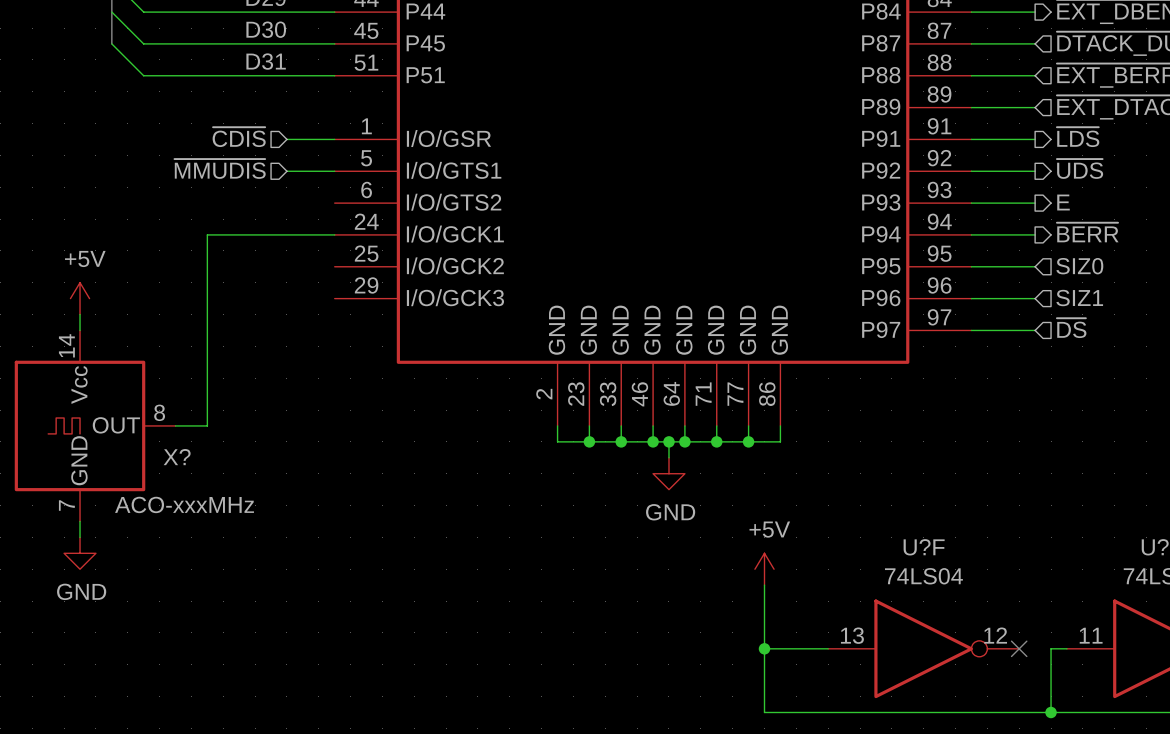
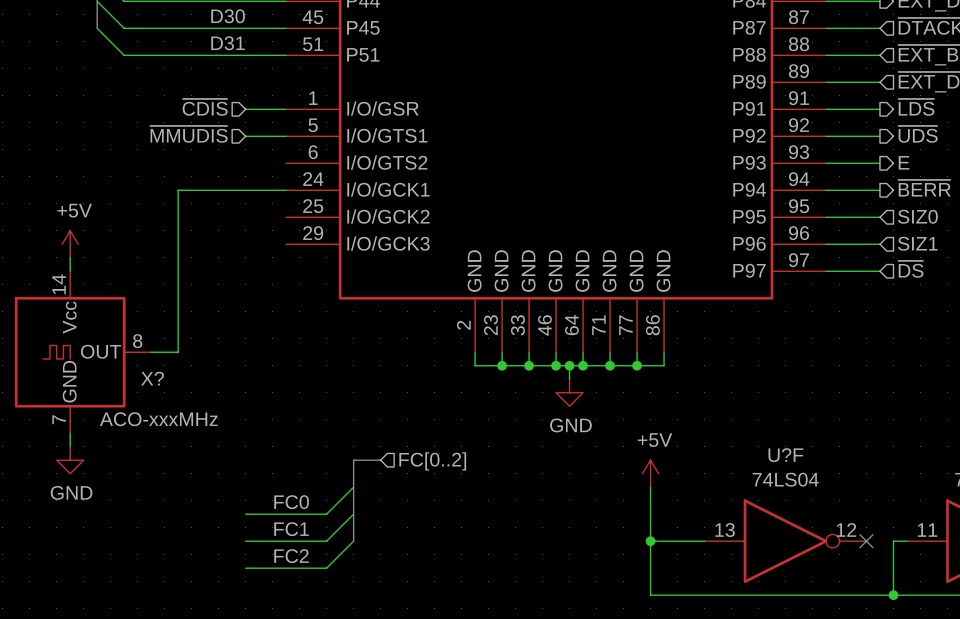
bus: none -> (380, 460) (353, 460) (353, 541)
hierarchical label: none -> FC[0..2] (432, 461)
wire: none -> (353, 487) (326, 514) (245, 514)
label: none -> FC0 (291, 502)
wire: none -> (353, 514) (326, 541) (245, 541)
label: none -> FC1 (291, 529)
wire: none -> (353, 541) (326, 568) (245, 568)
label: none -> FC2 (291, 556)

